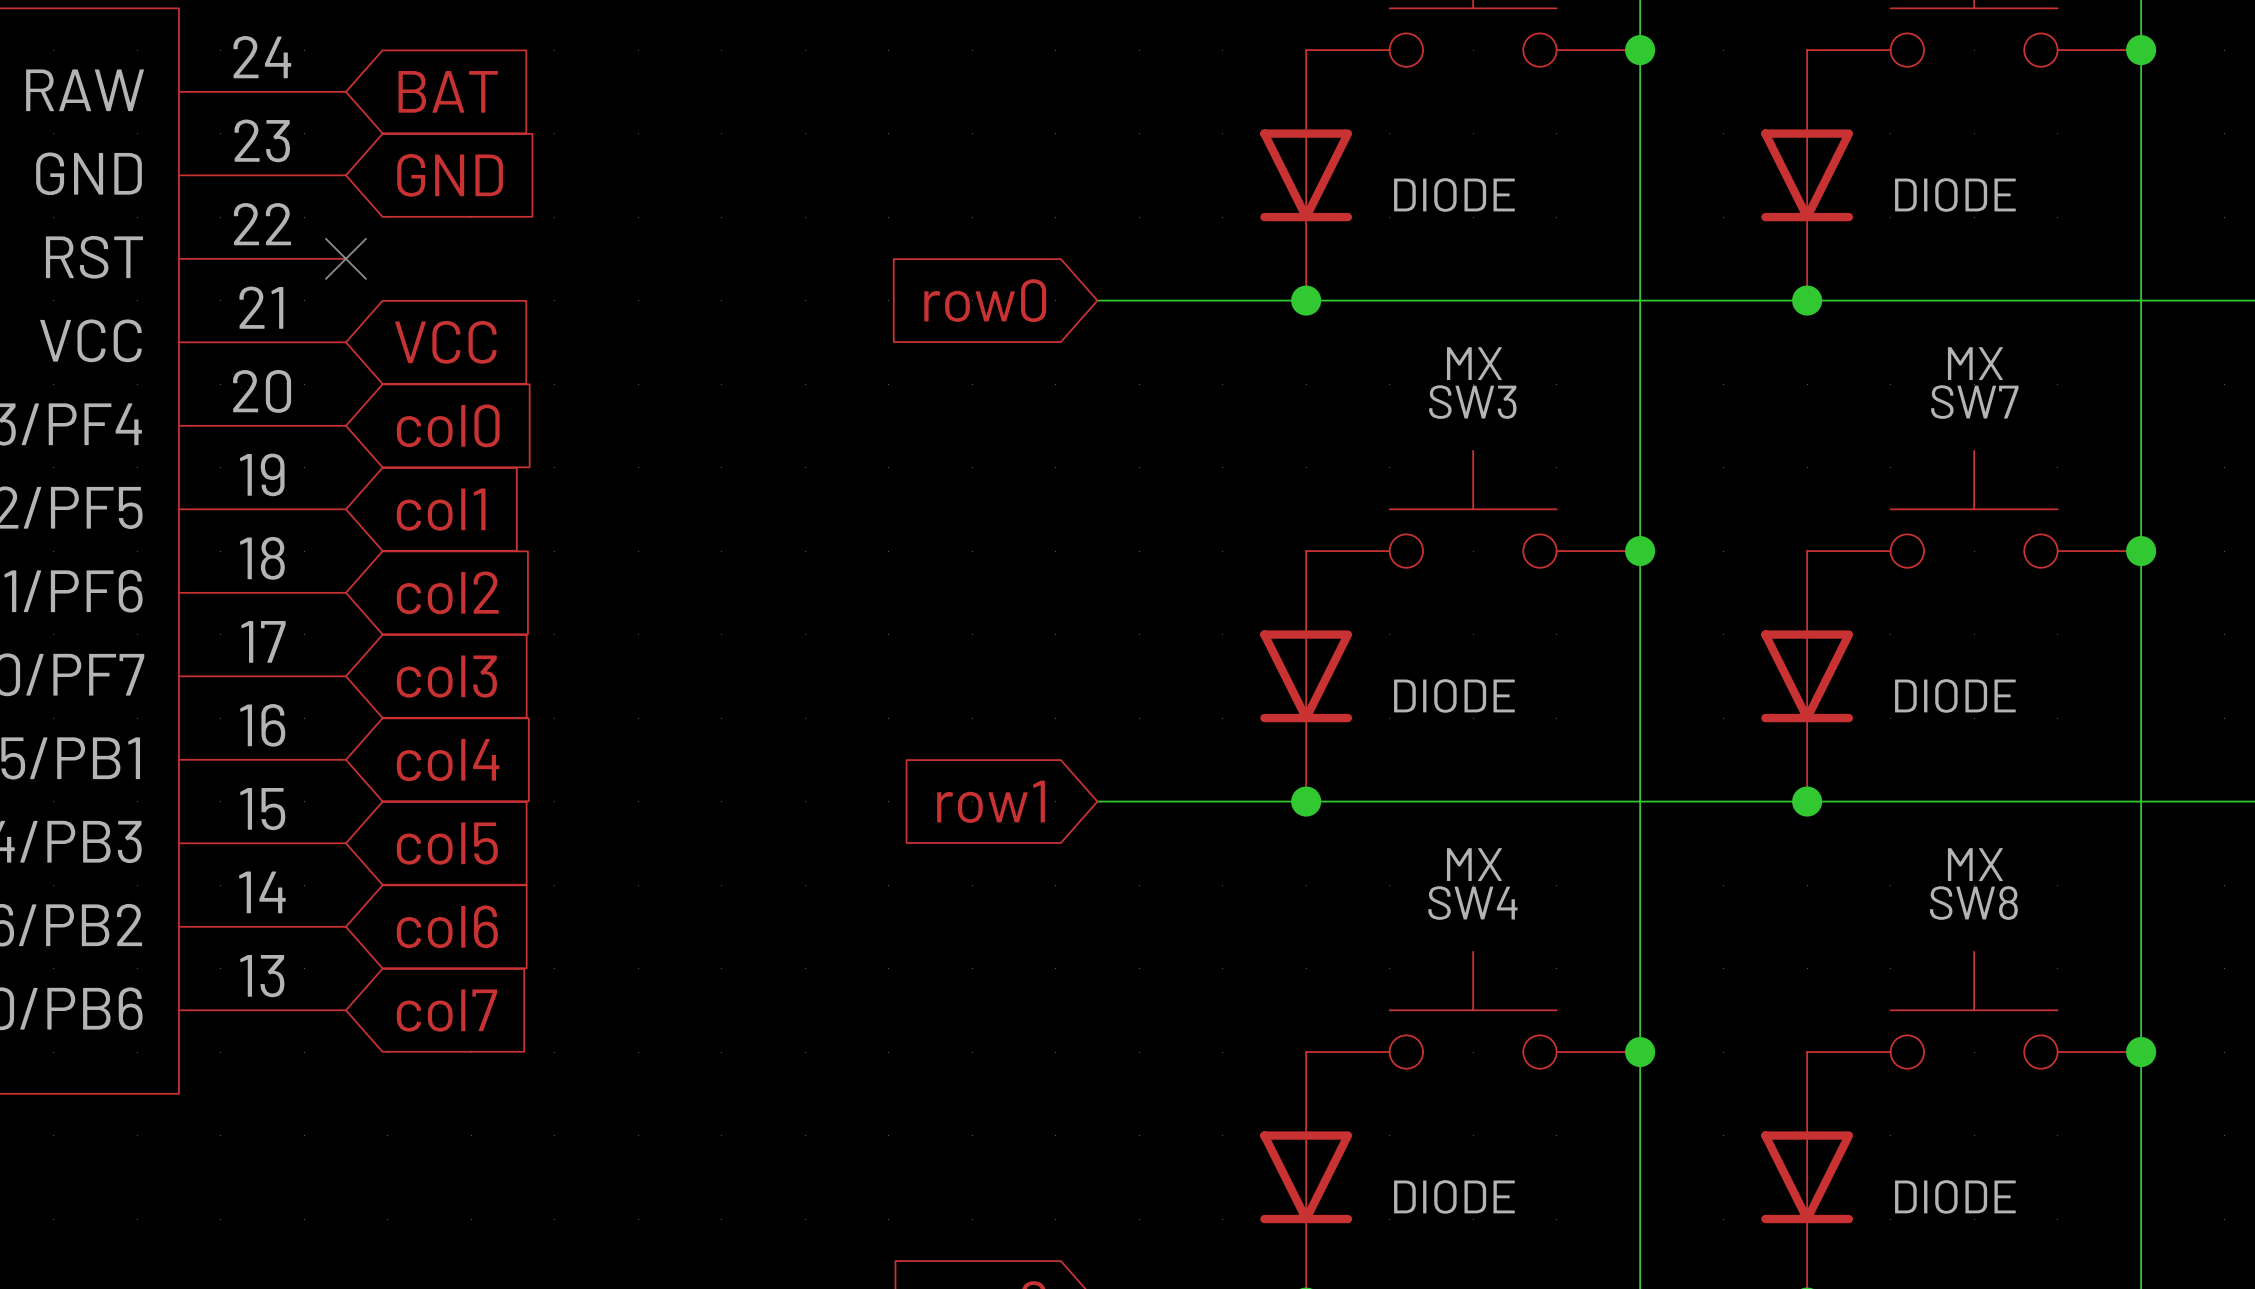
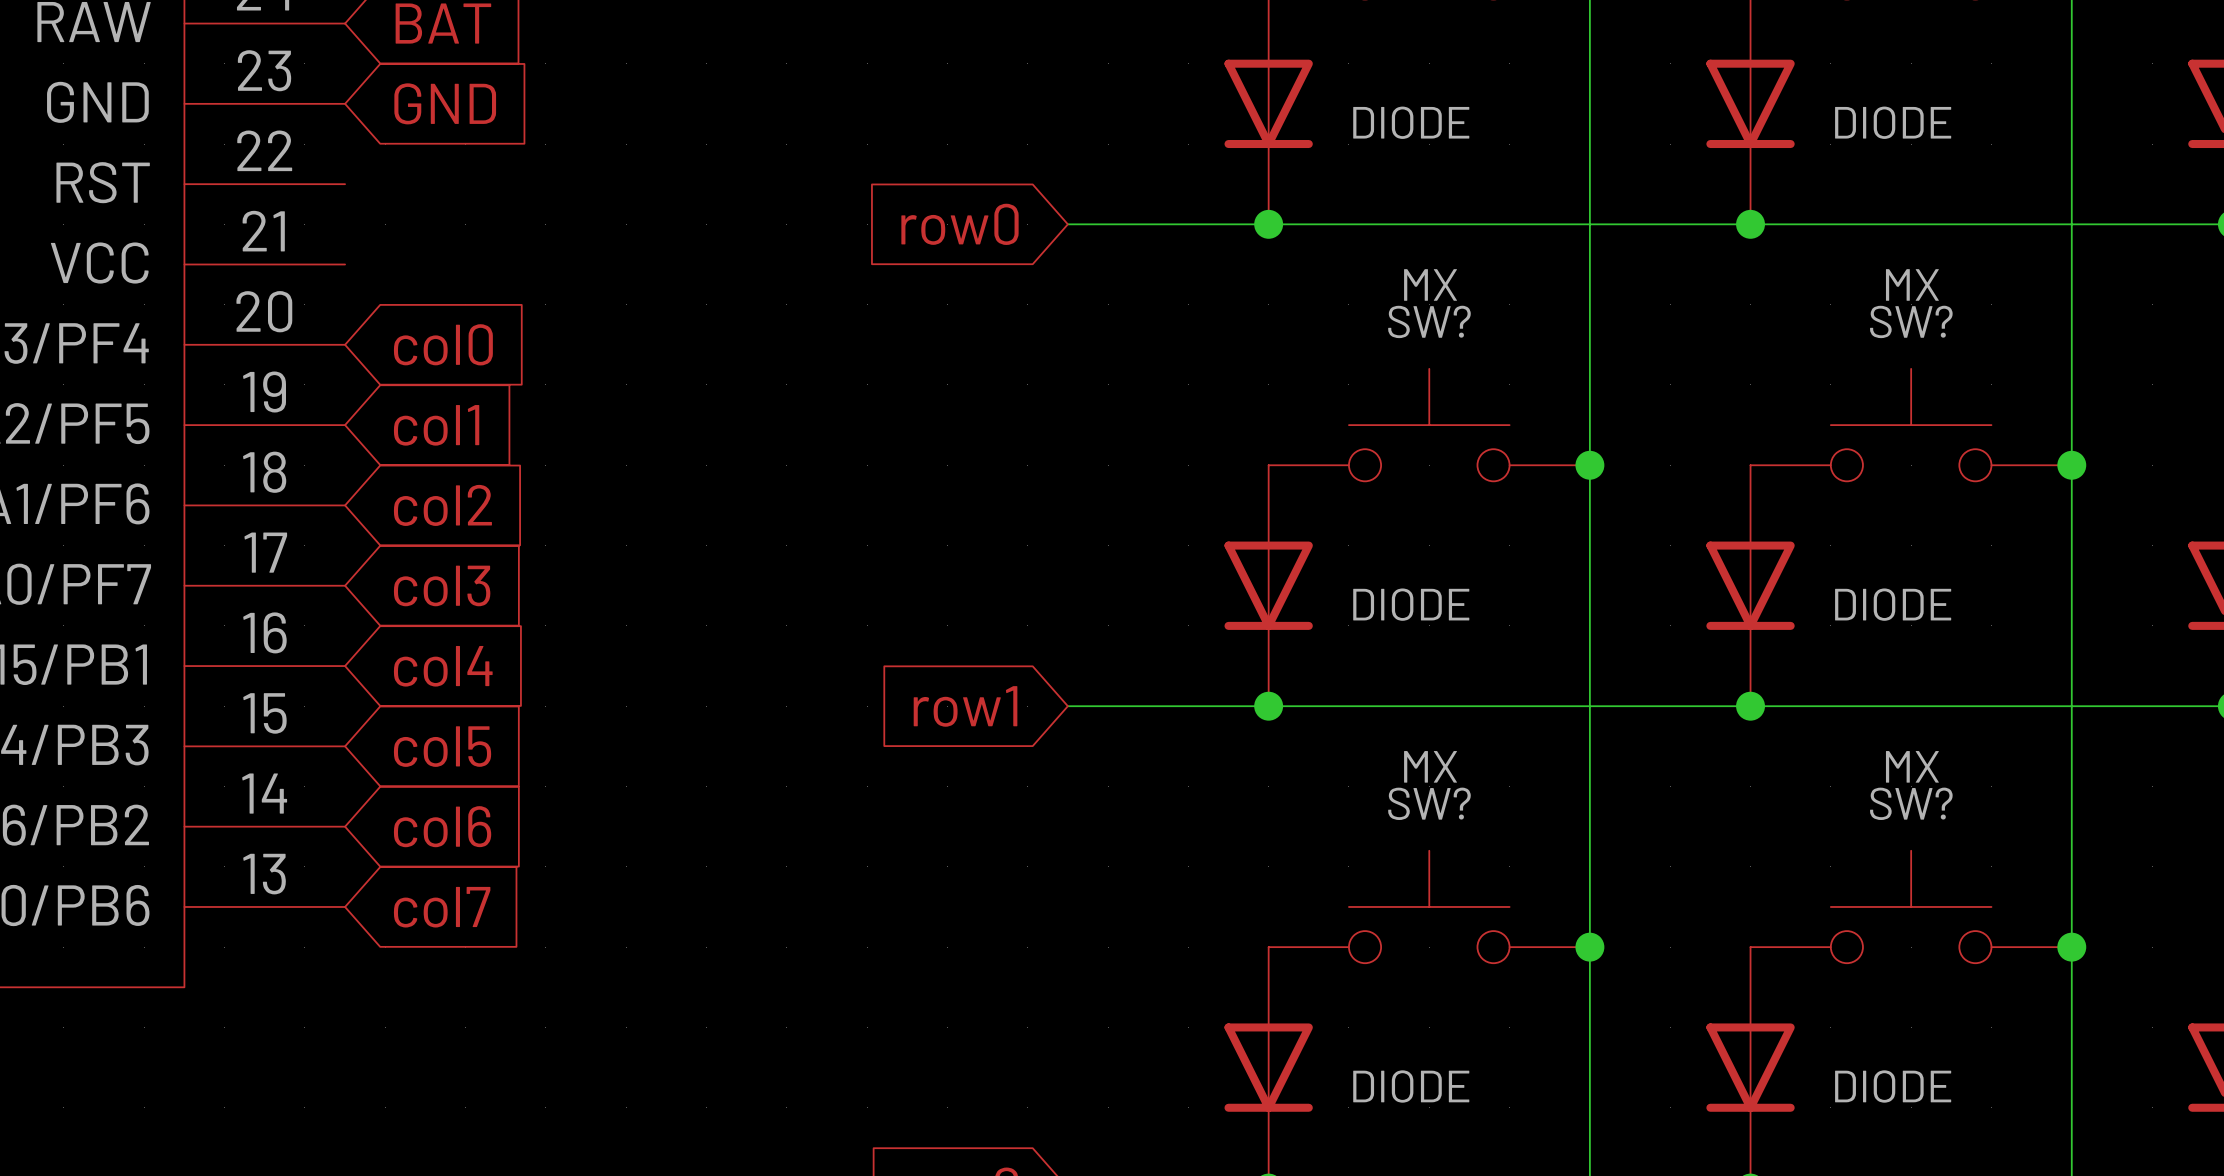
no-connect mark: (345, 258) -> none
global label: VCC (445, 342) -> none
SW3 name: SW3 (1472, 402) -> SW? (1429, 321)
SW7 name: SW7 (1974, 402) -> SW? (1911, 321)
SW4 name: SW4 (1472, 903) -> SW? (1429, 803)
SW8 name: SW8 (1973, 903) -> SW? (1911, 803)

